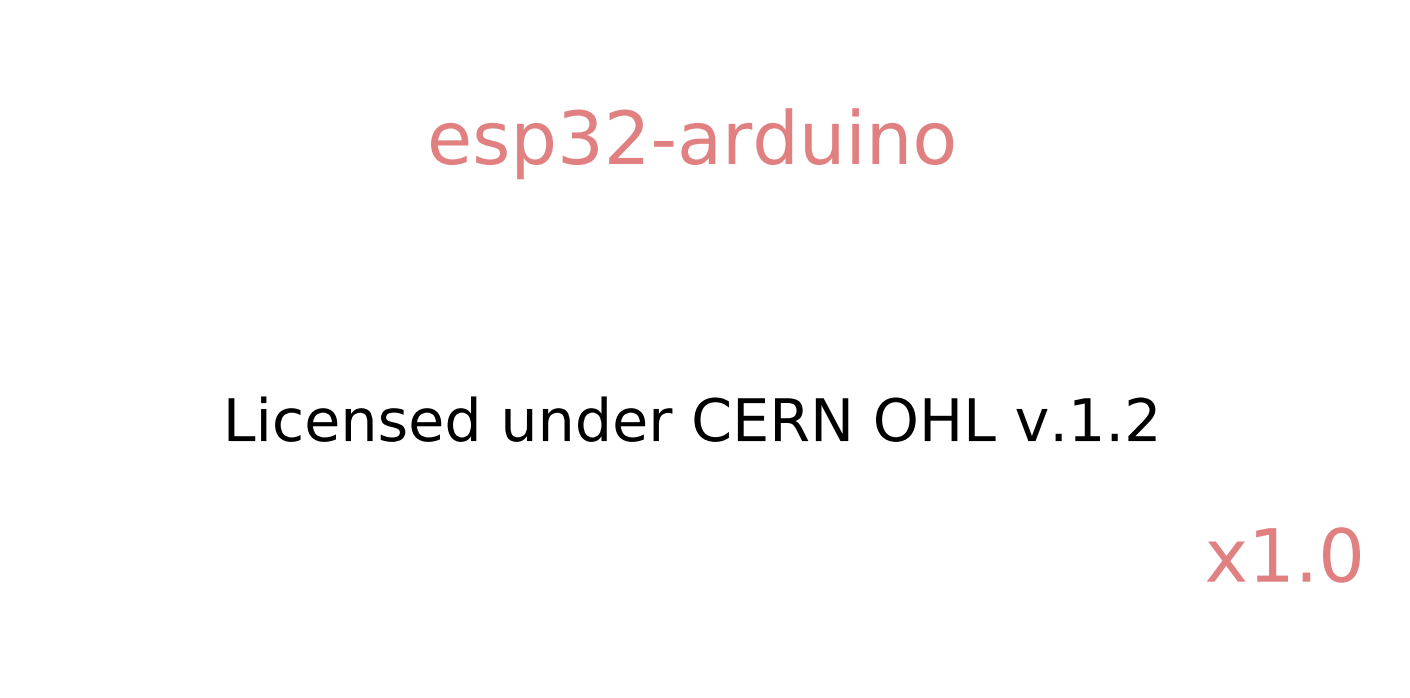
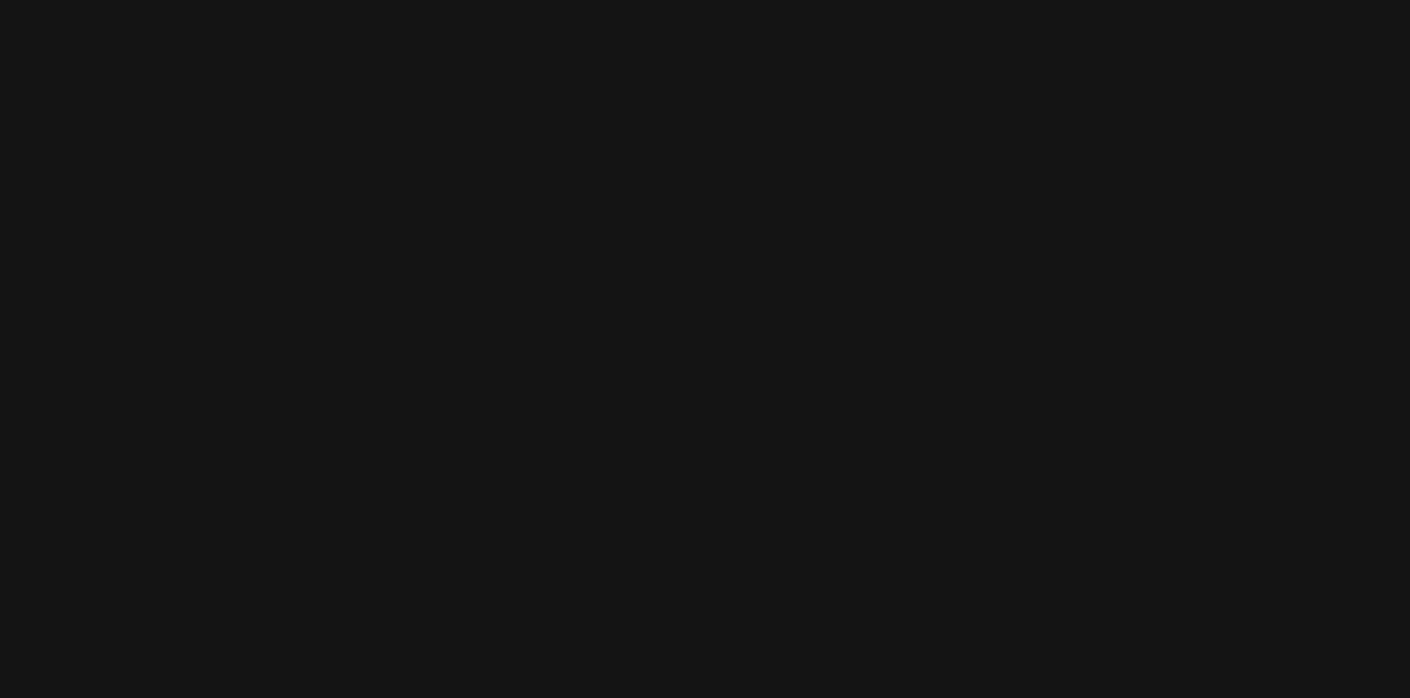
text: esp32-arduino (692, 143) -> none
text: Licensed under CERN OHL v.1.2 (692, 419) -> none
text: x1.0 (1283, 554) -> none

